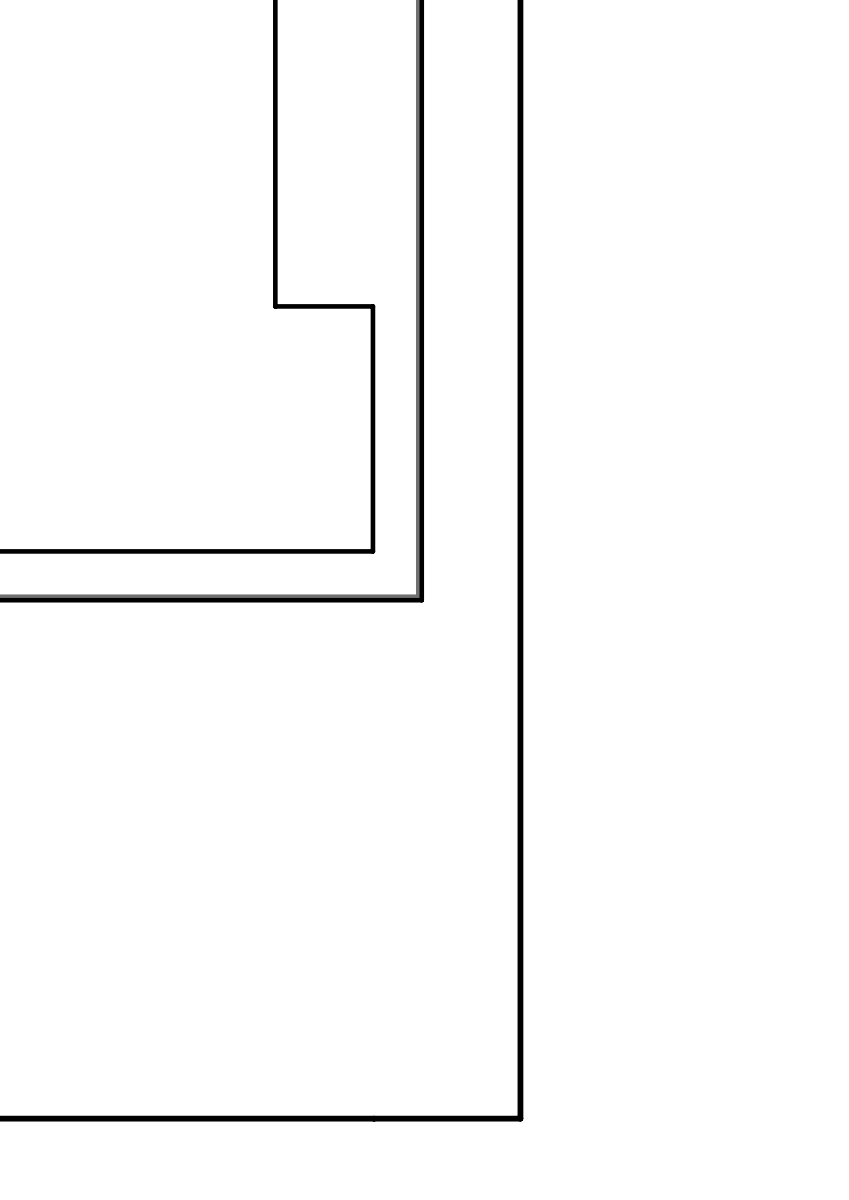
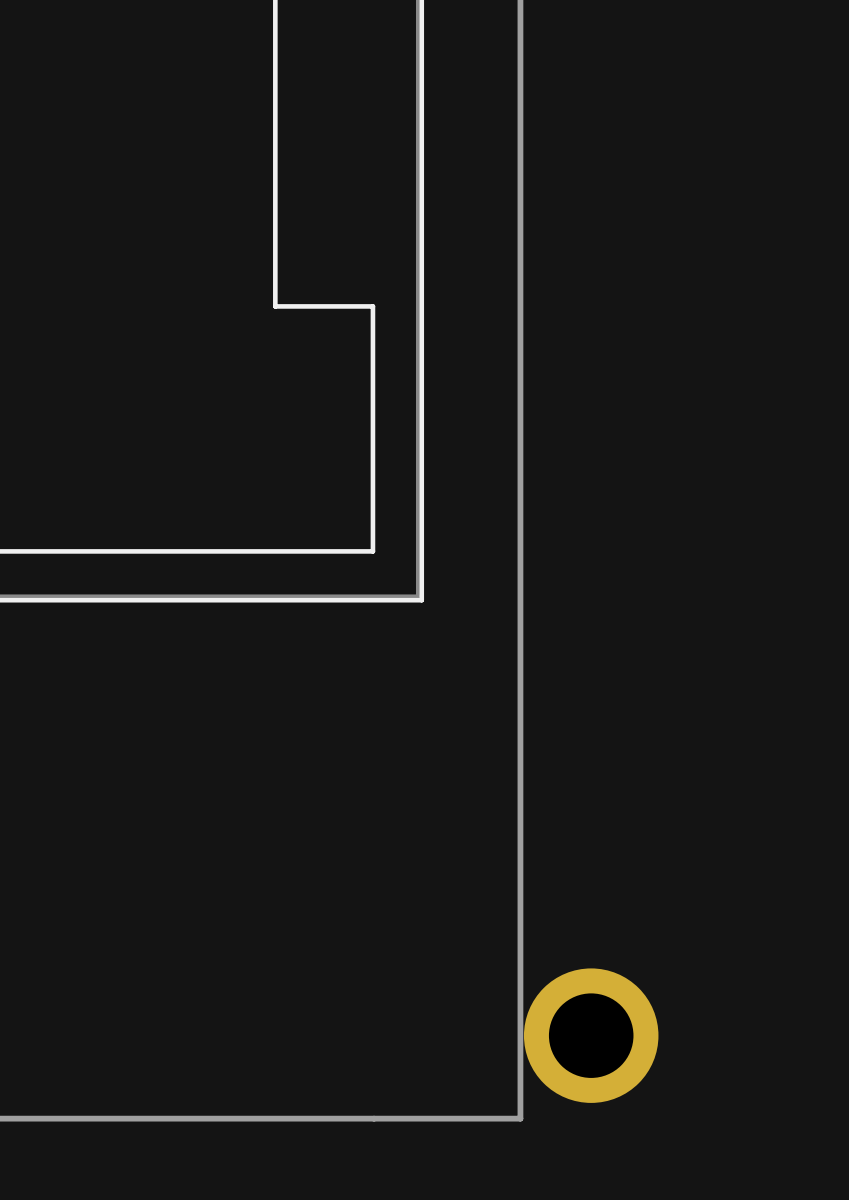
part: none -> (591, 1035)

